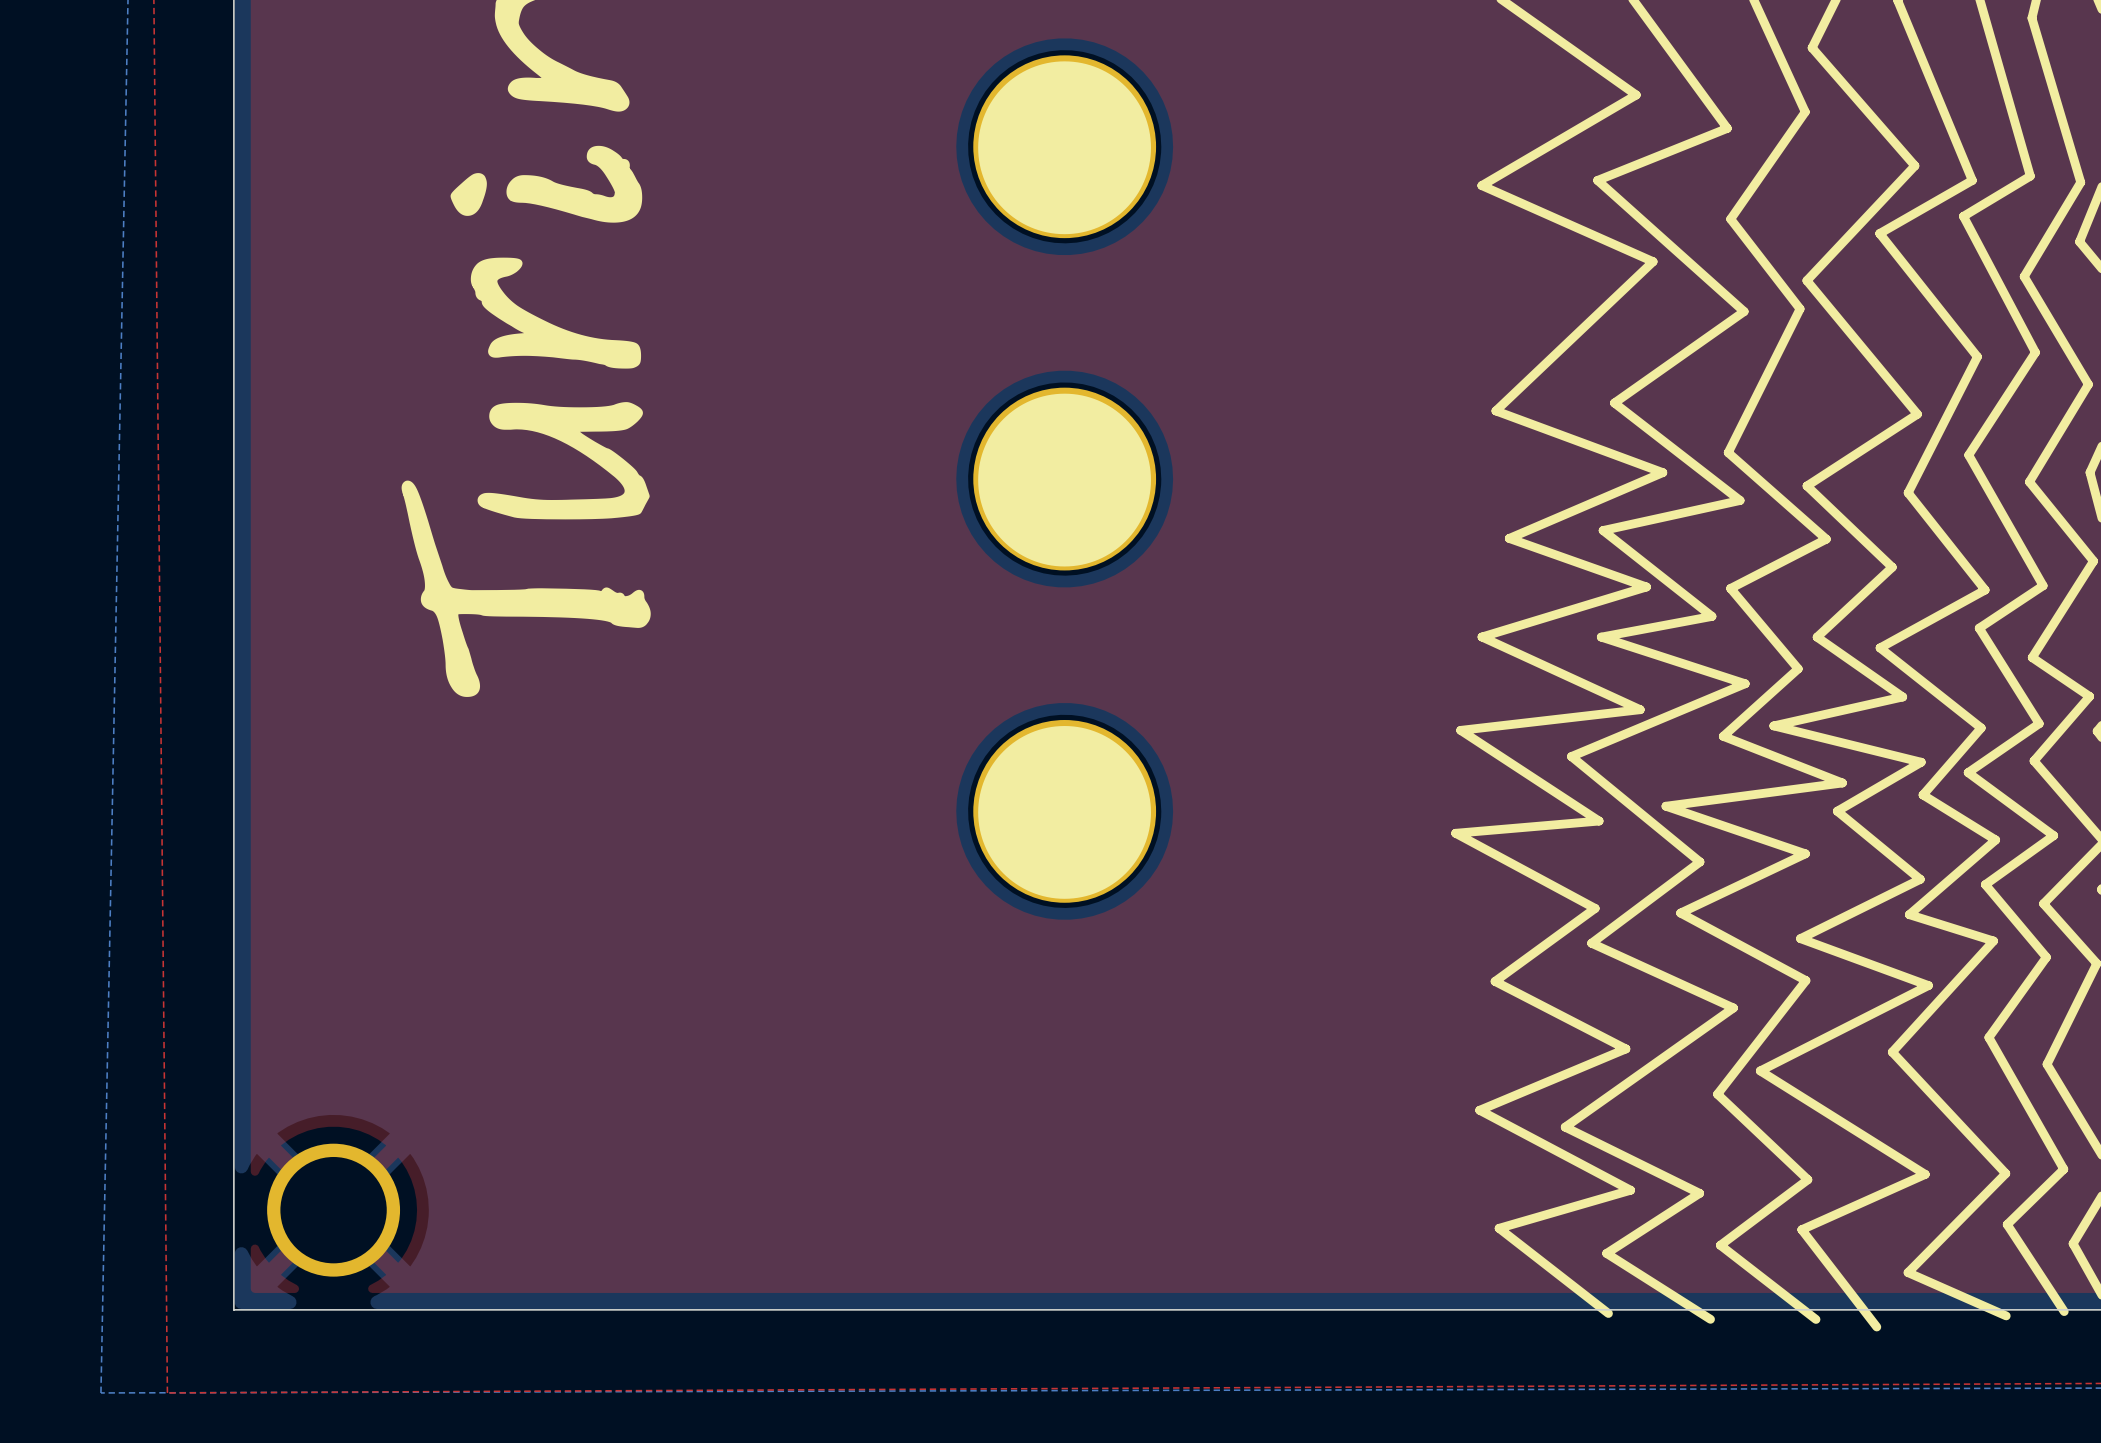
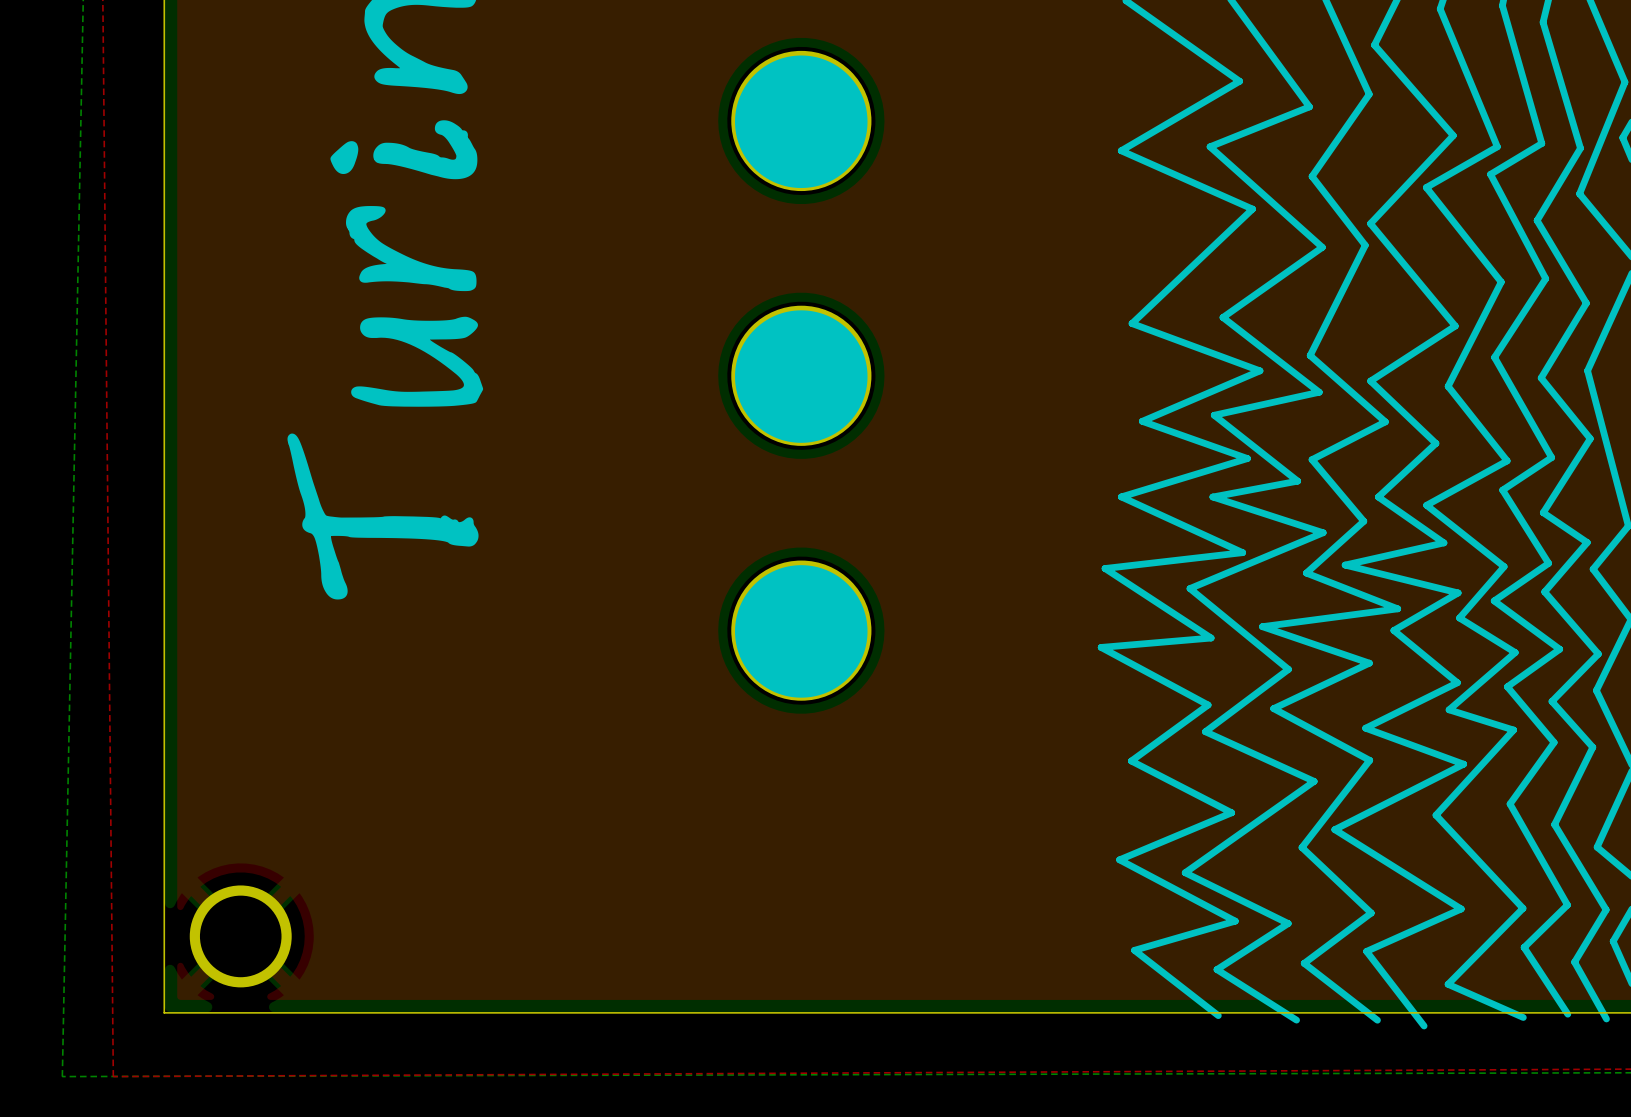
drawing position: (526, 588) -> (383, 516)

